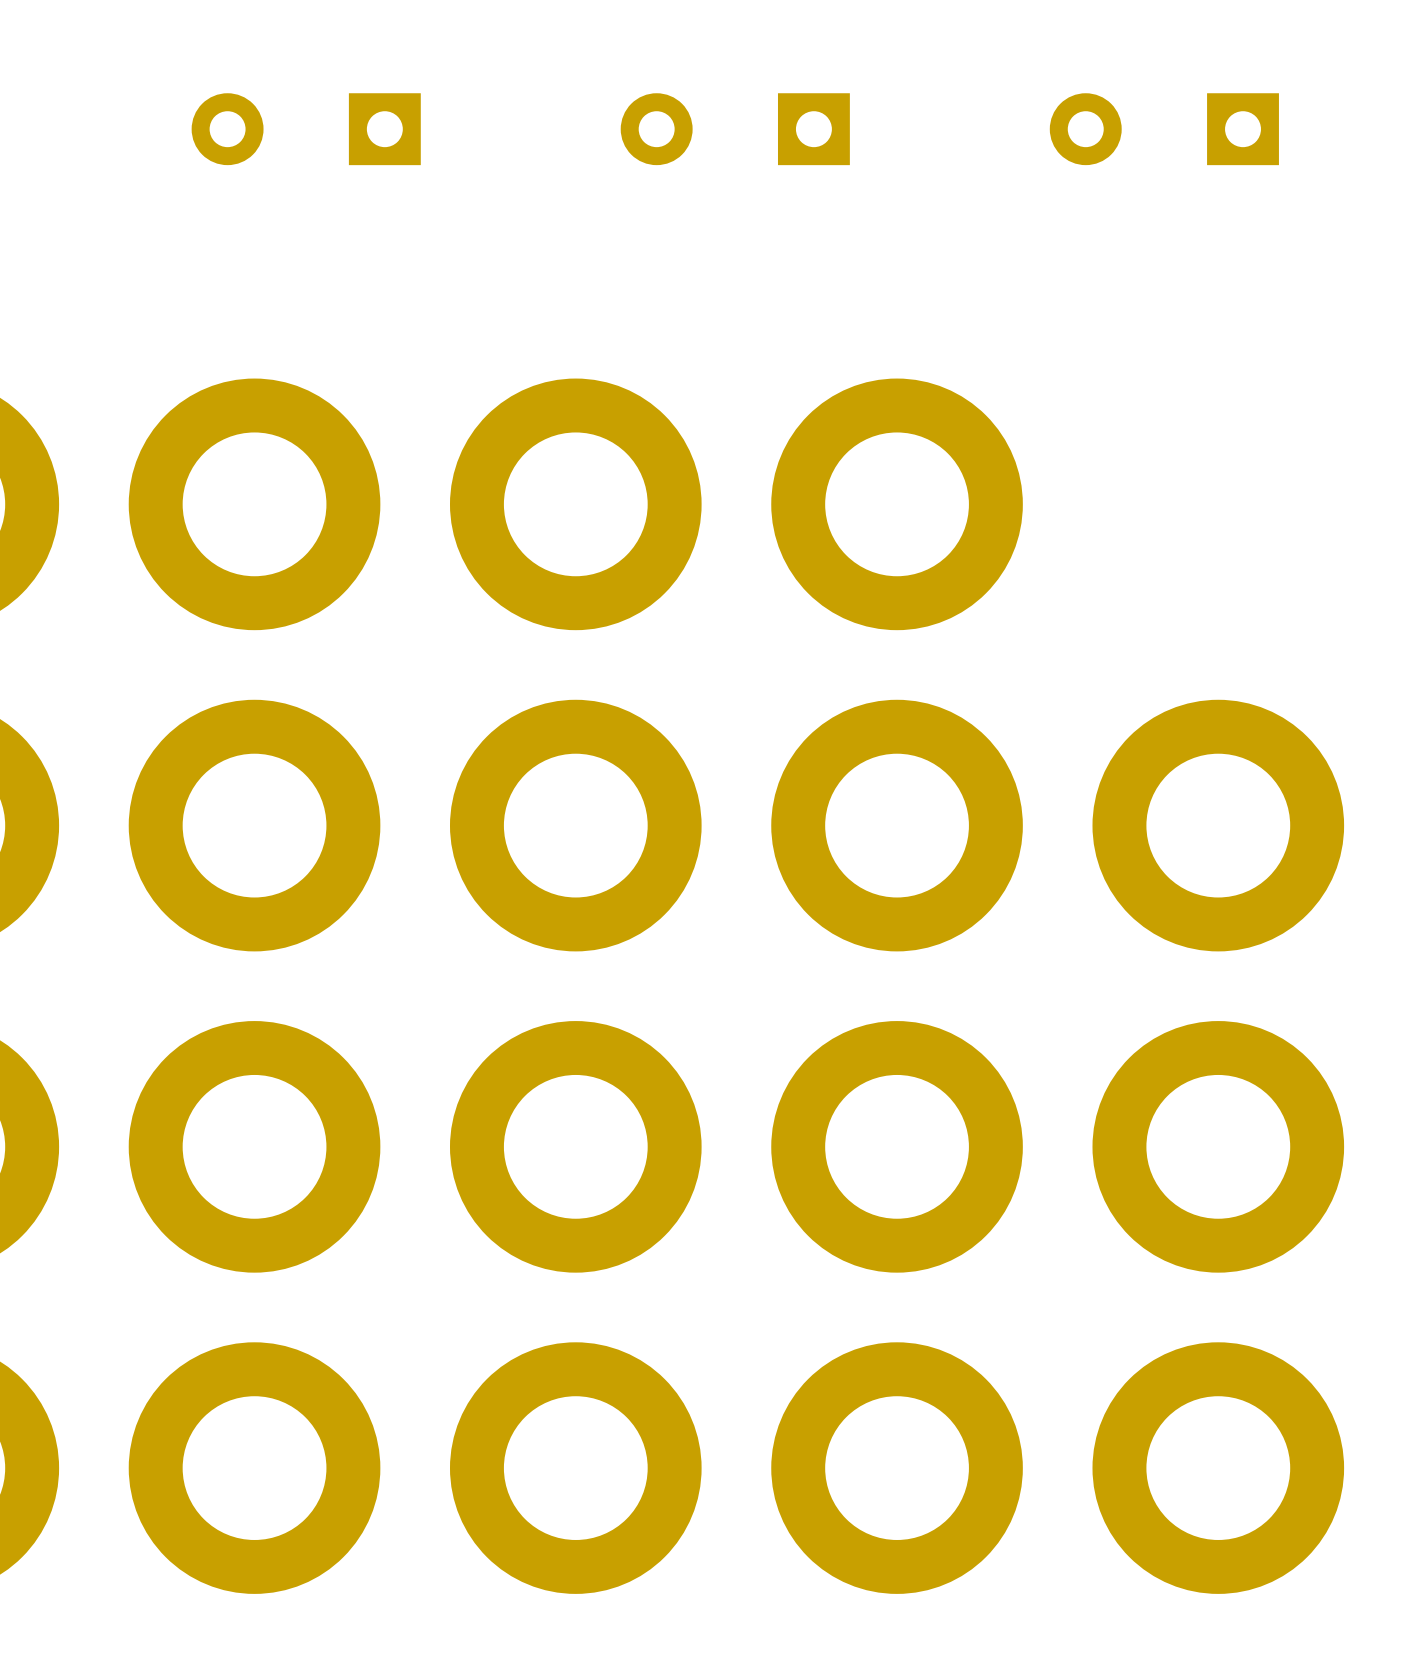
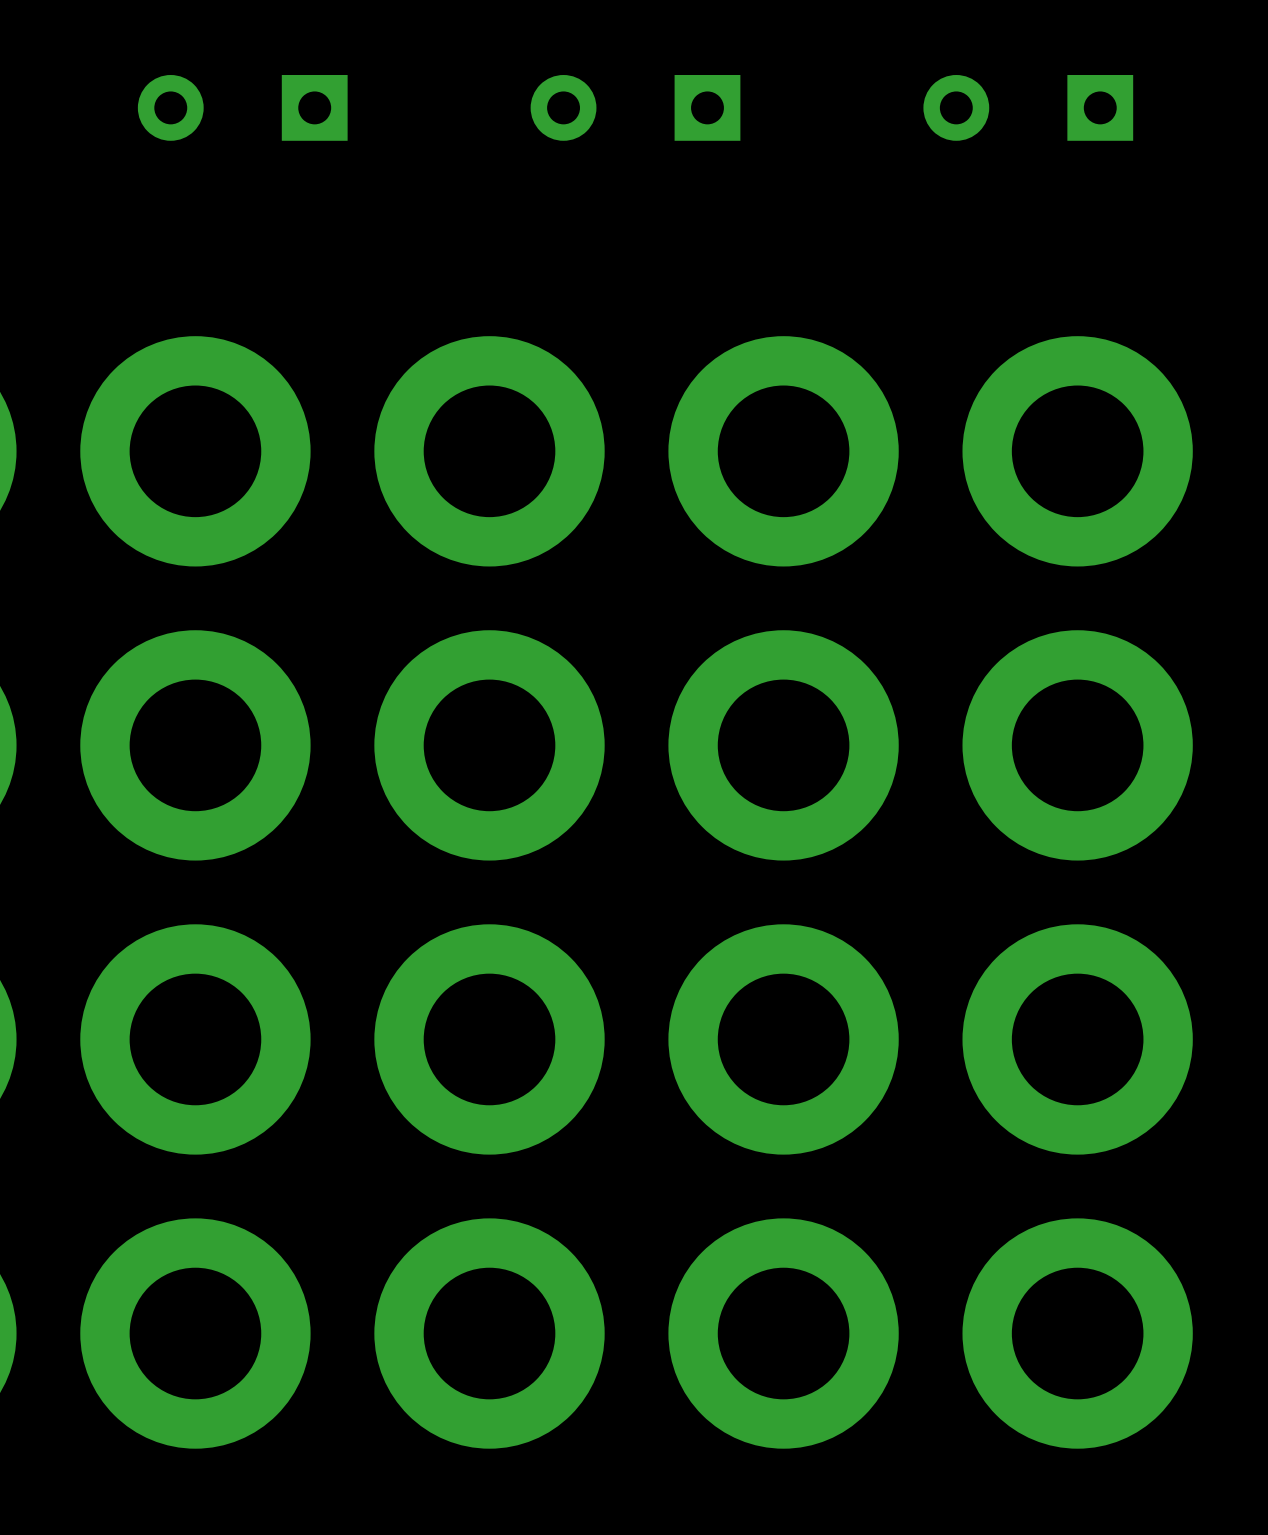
part: none -> (1077, 451)

